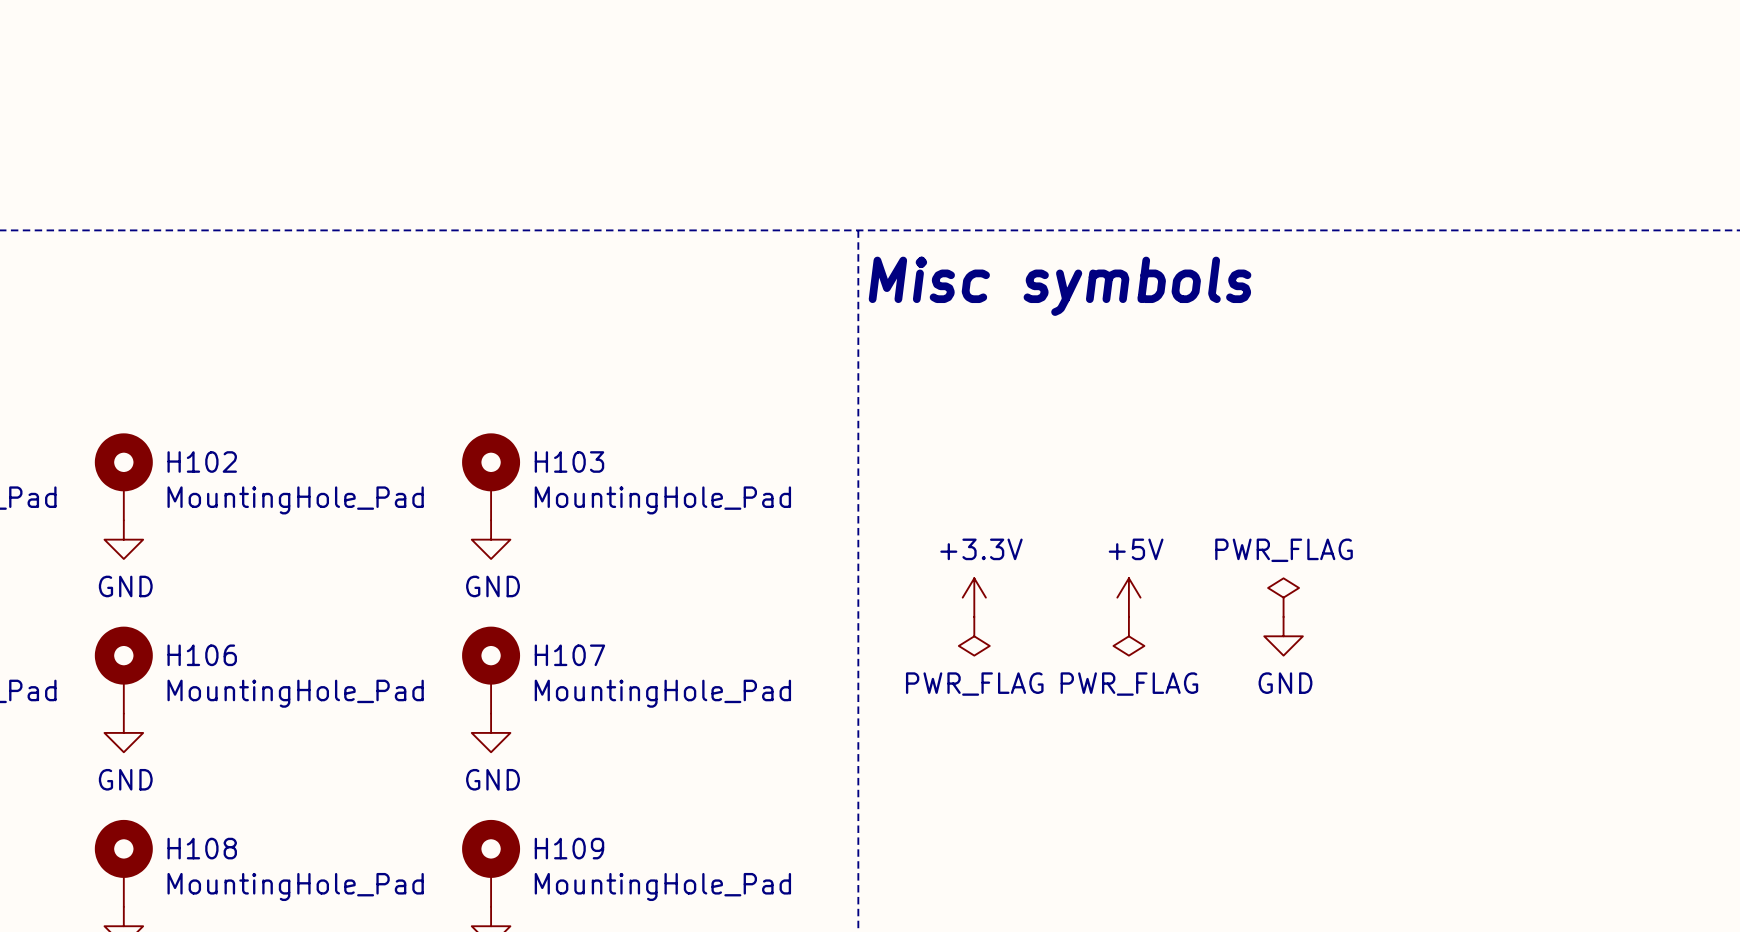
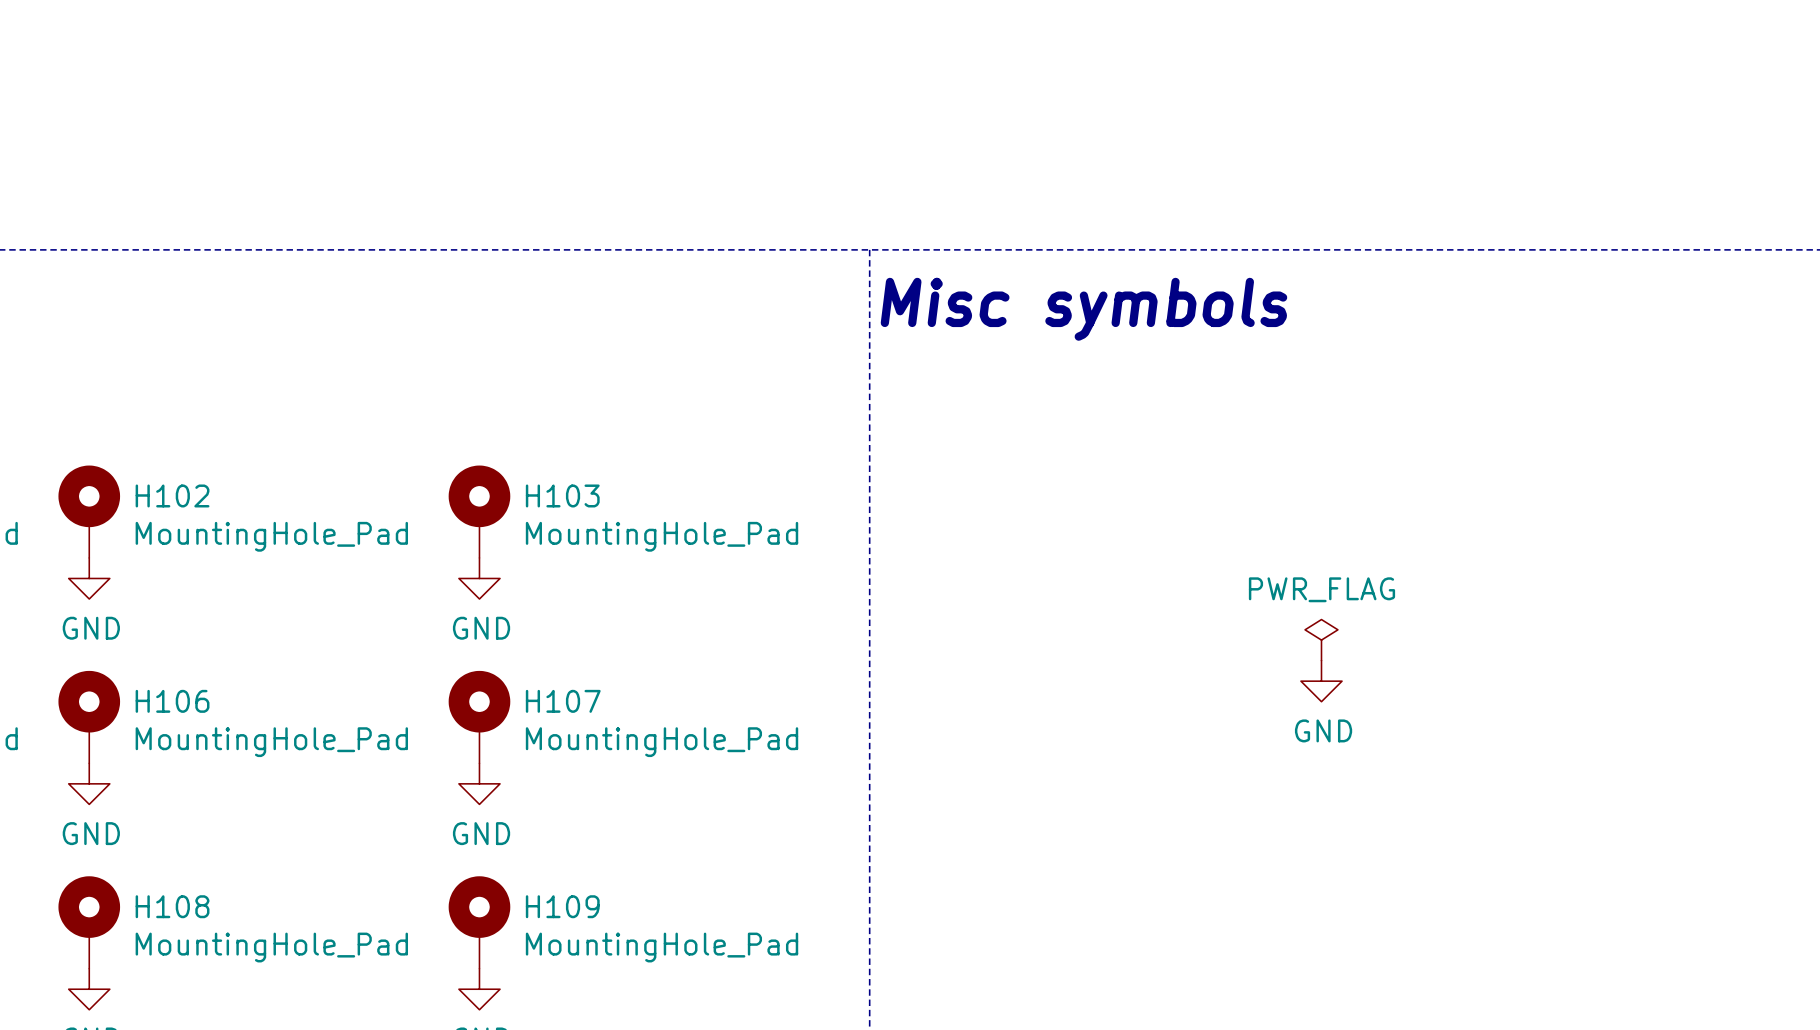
power symbol: +3.3V (974, 597) -> none
power symbol: +5V (1128, 597) -> none
power symbol: PWR_FLAG (974, 636) -> none
power symbol: PWR_FLAG (1128, 636) -> none

